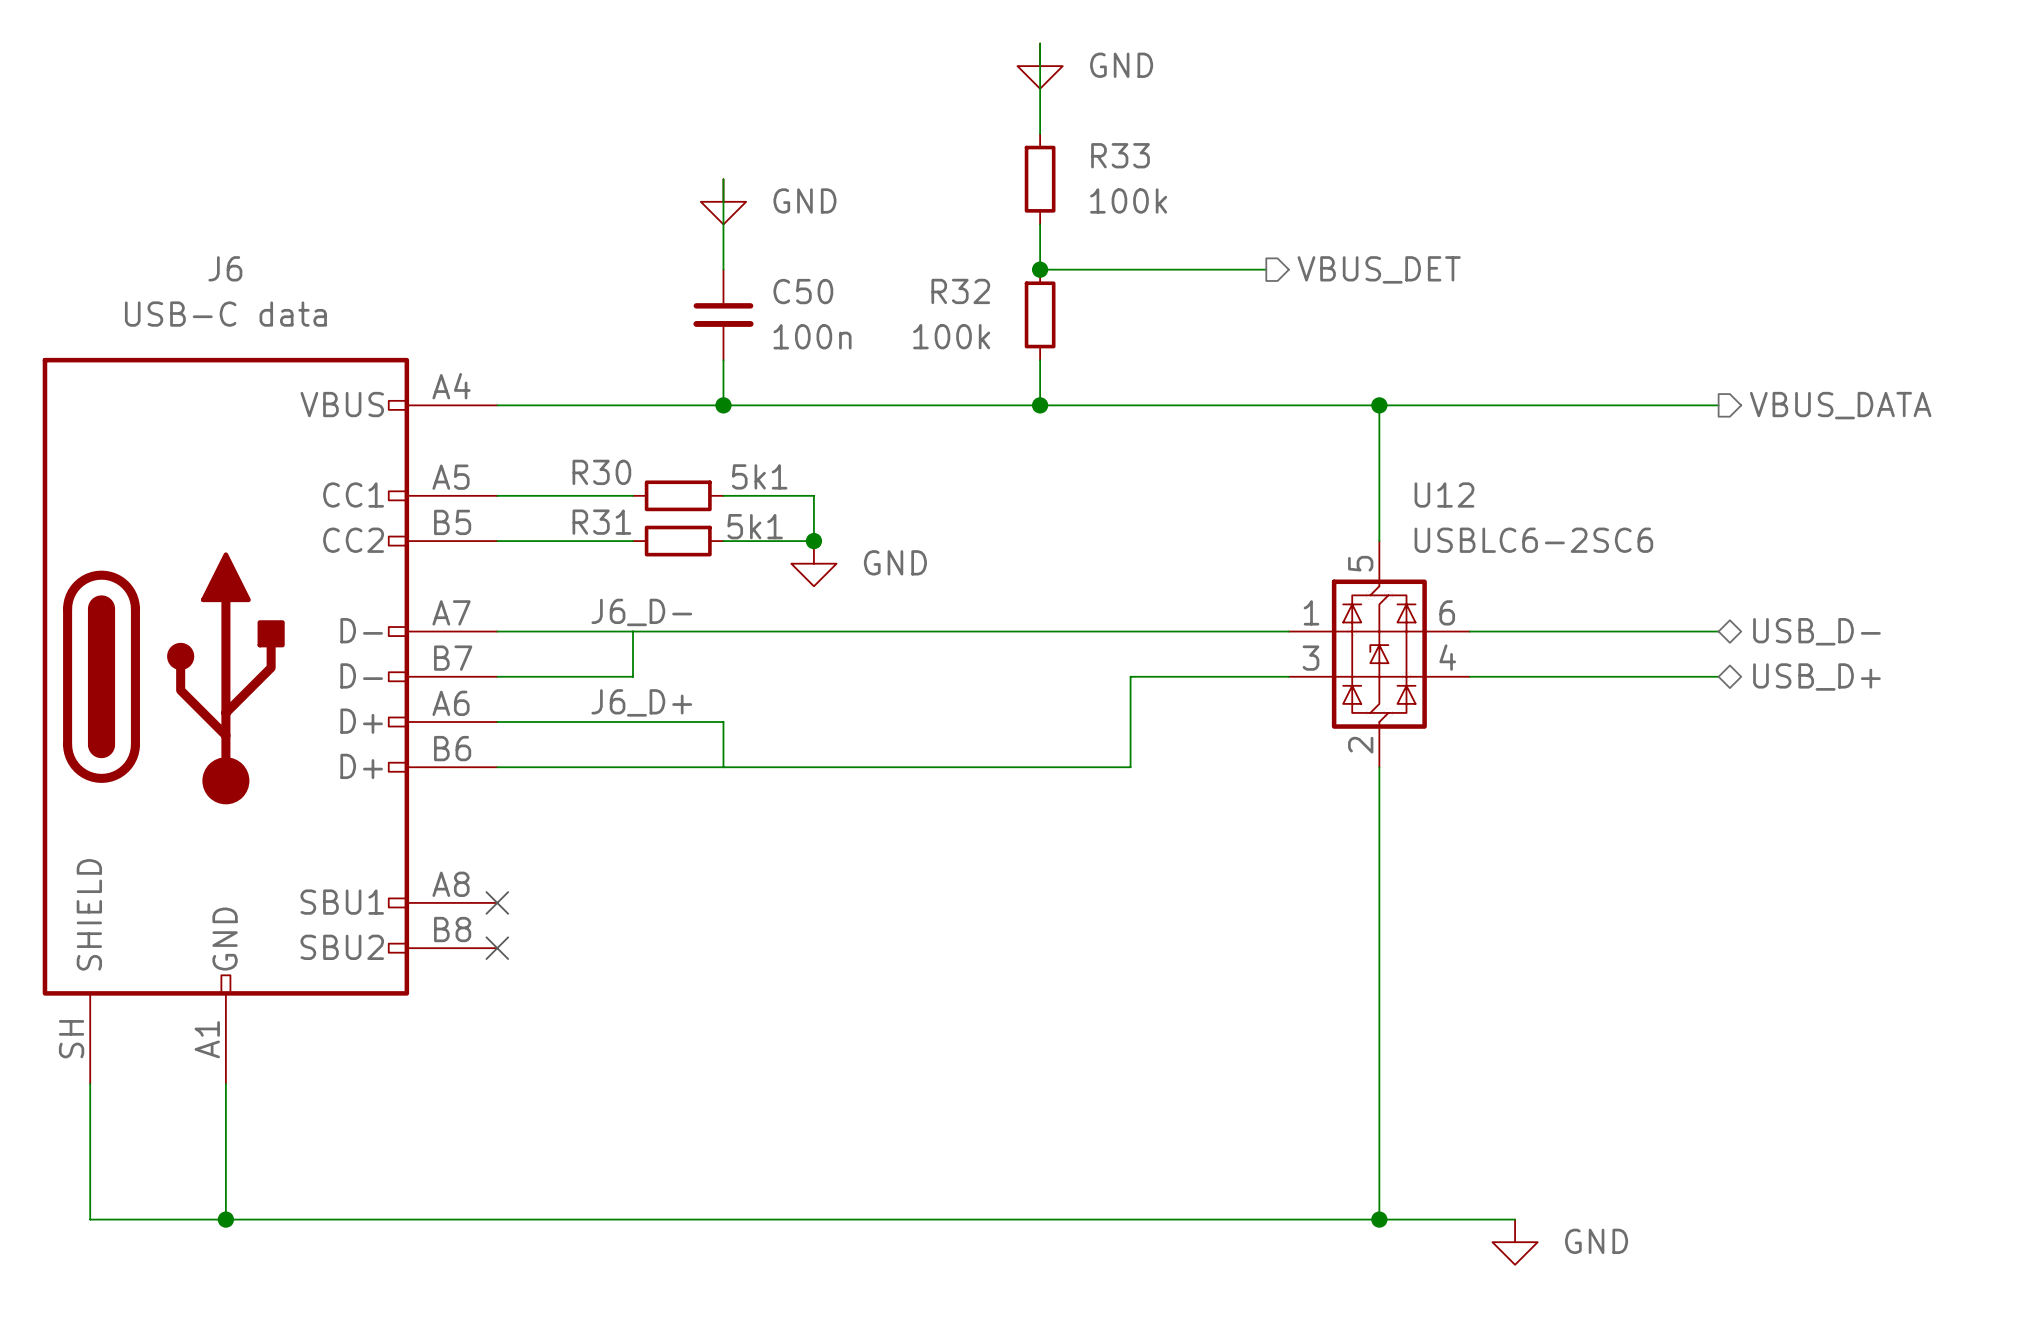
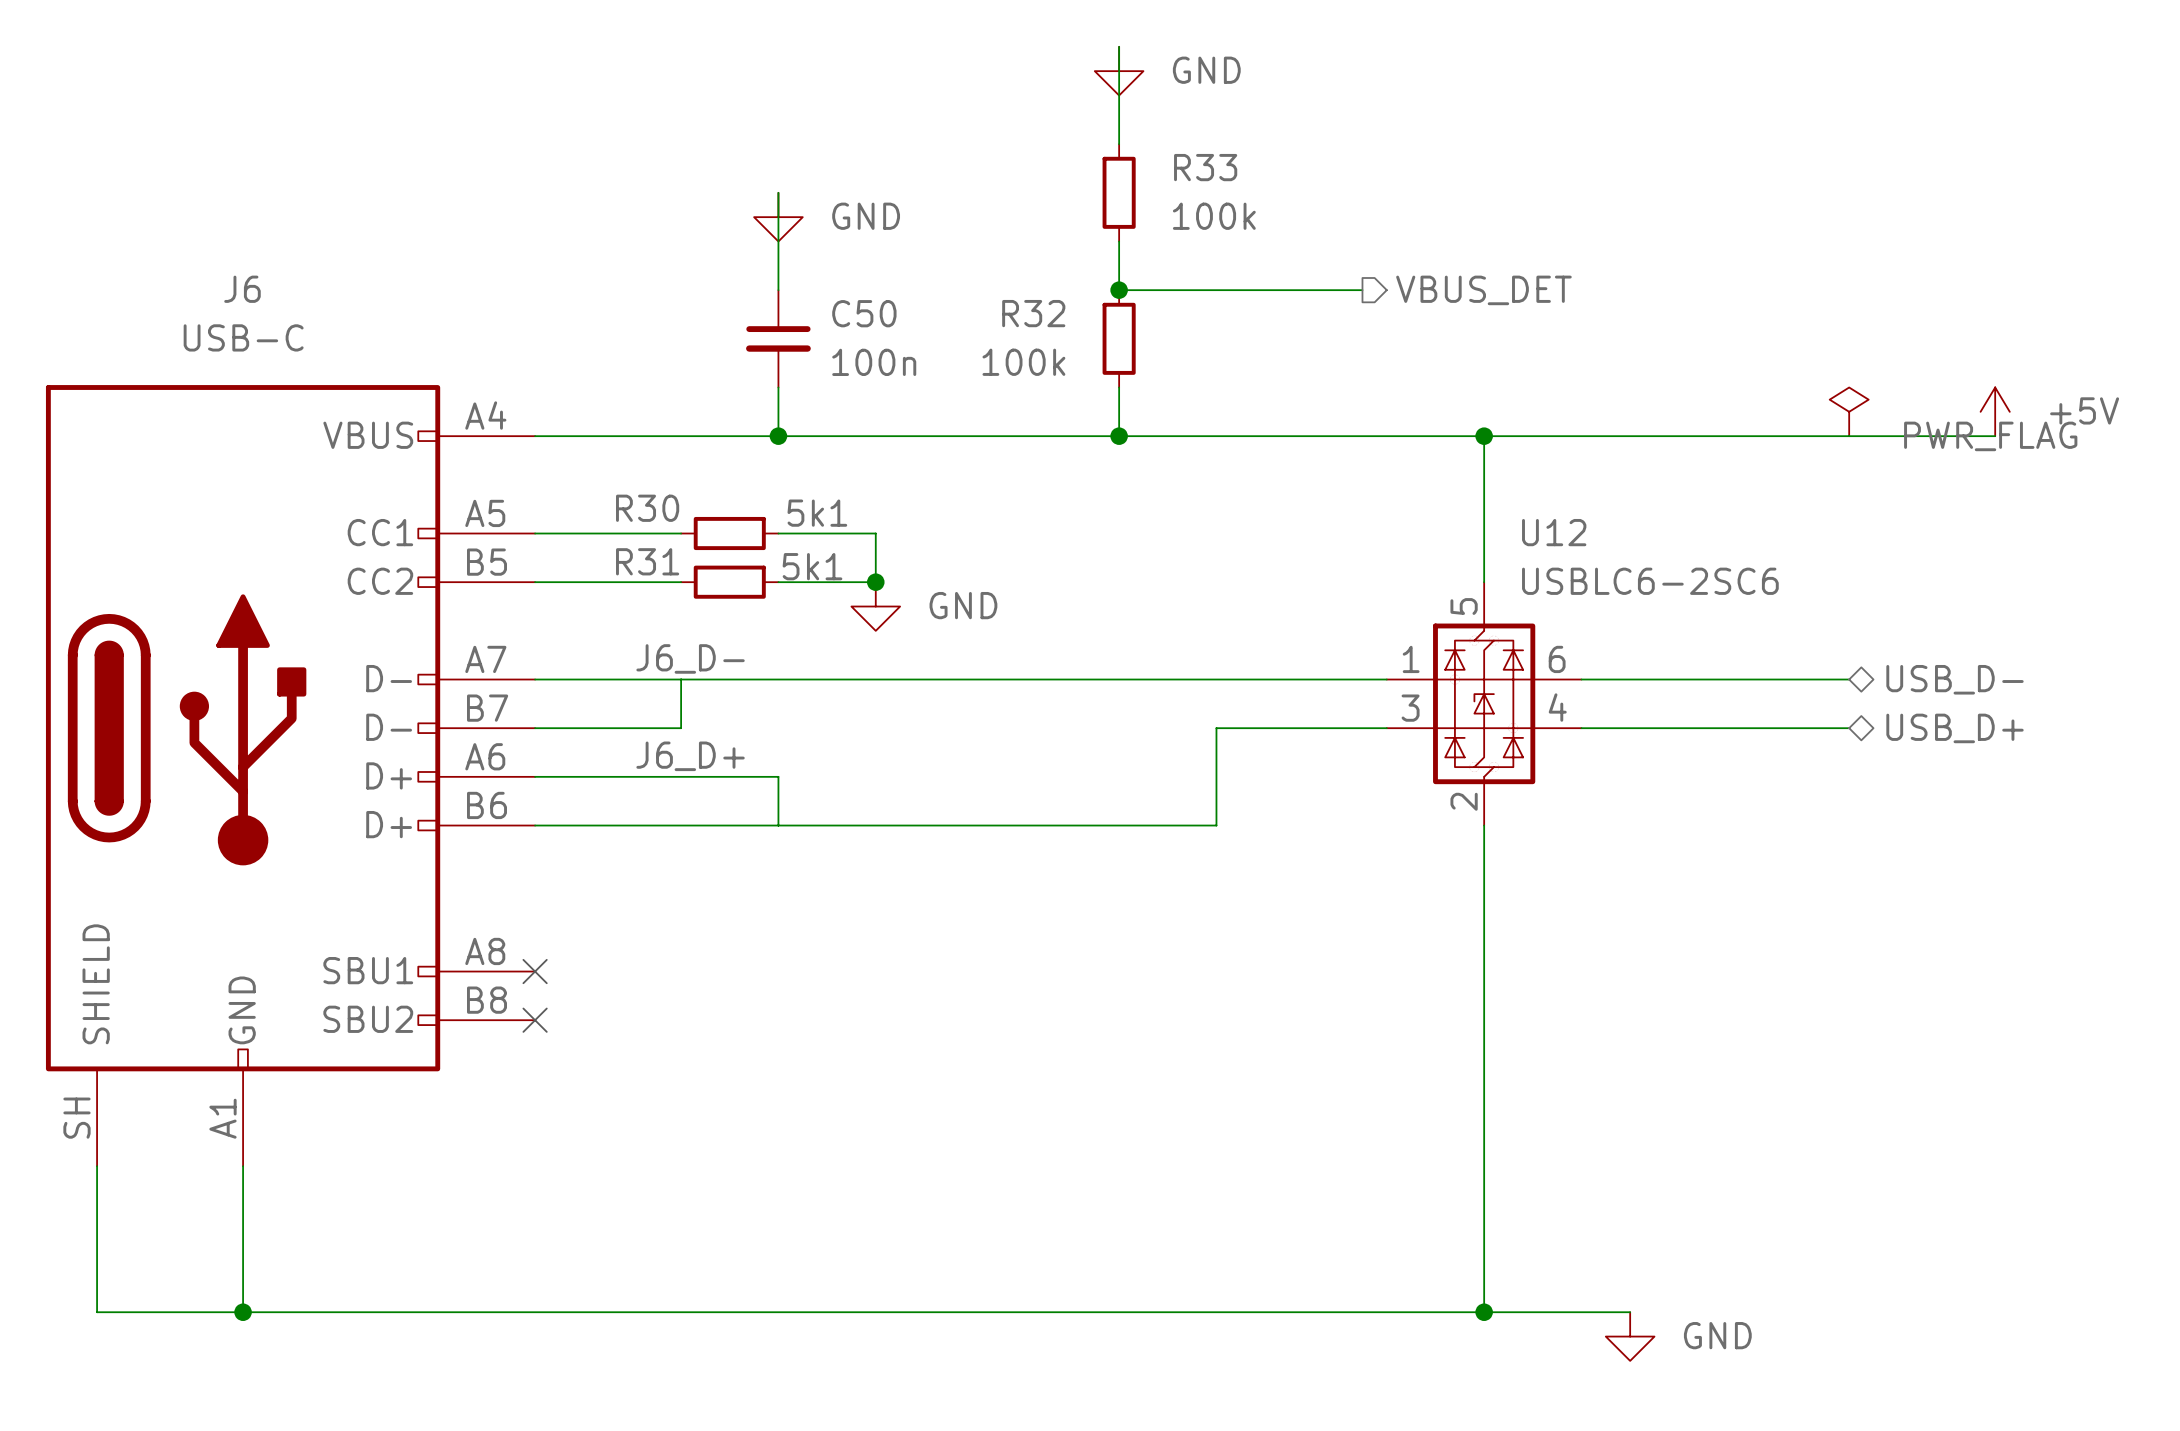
J6 value: USB-C data (225, 314) -> USB-C (243, 337)
power symbol: none -> PWR_FLAG (1849, 411)
power symbol: none -> +5V (1995, 411)
wire: none -> (1849, 436) (1995, 436)
hierarchical label: VBUS_DATA (1840, 405) -> none

